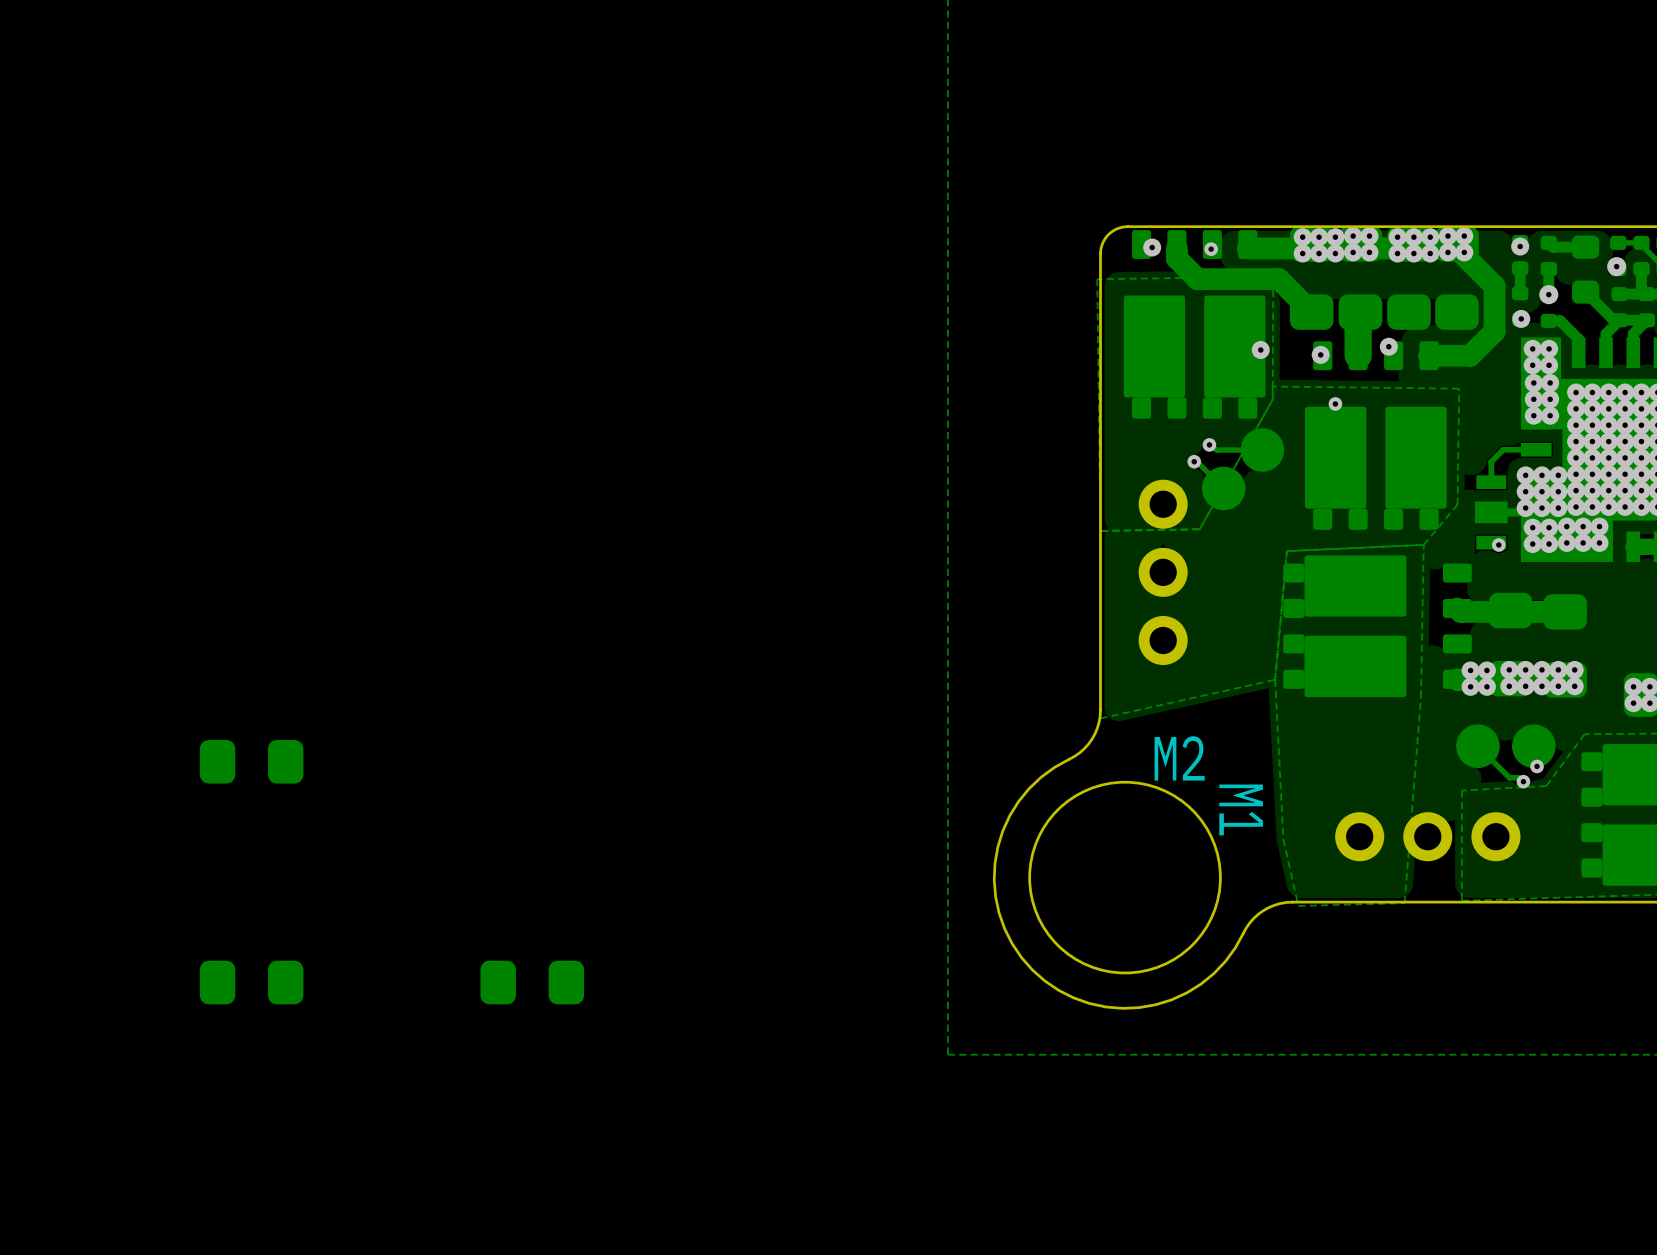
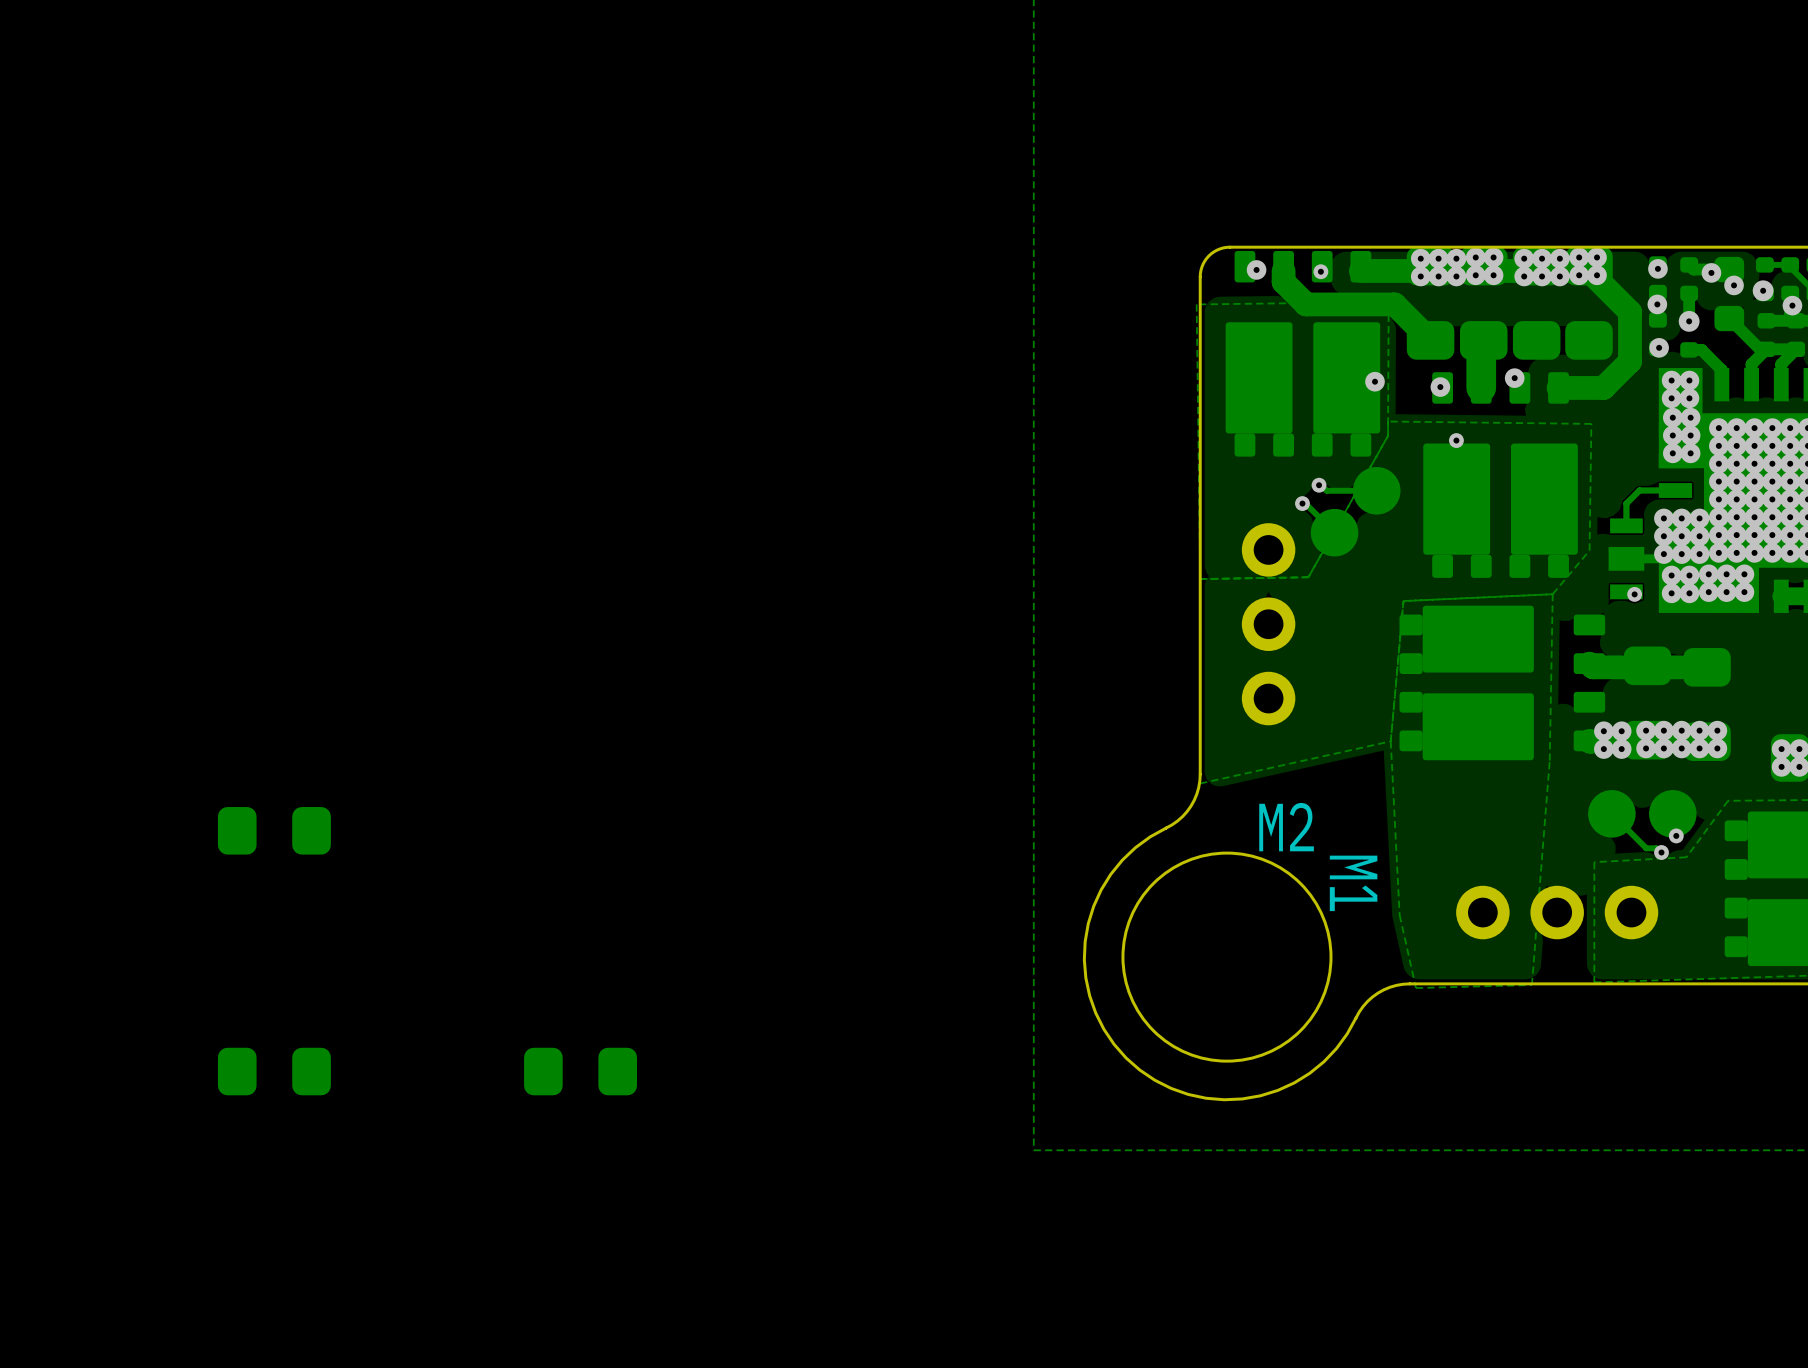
via: none -> (1711, 272)
via: none -> (1734, 285)
via: none -> (1657, 304)
via: none -> (1792, 305)

